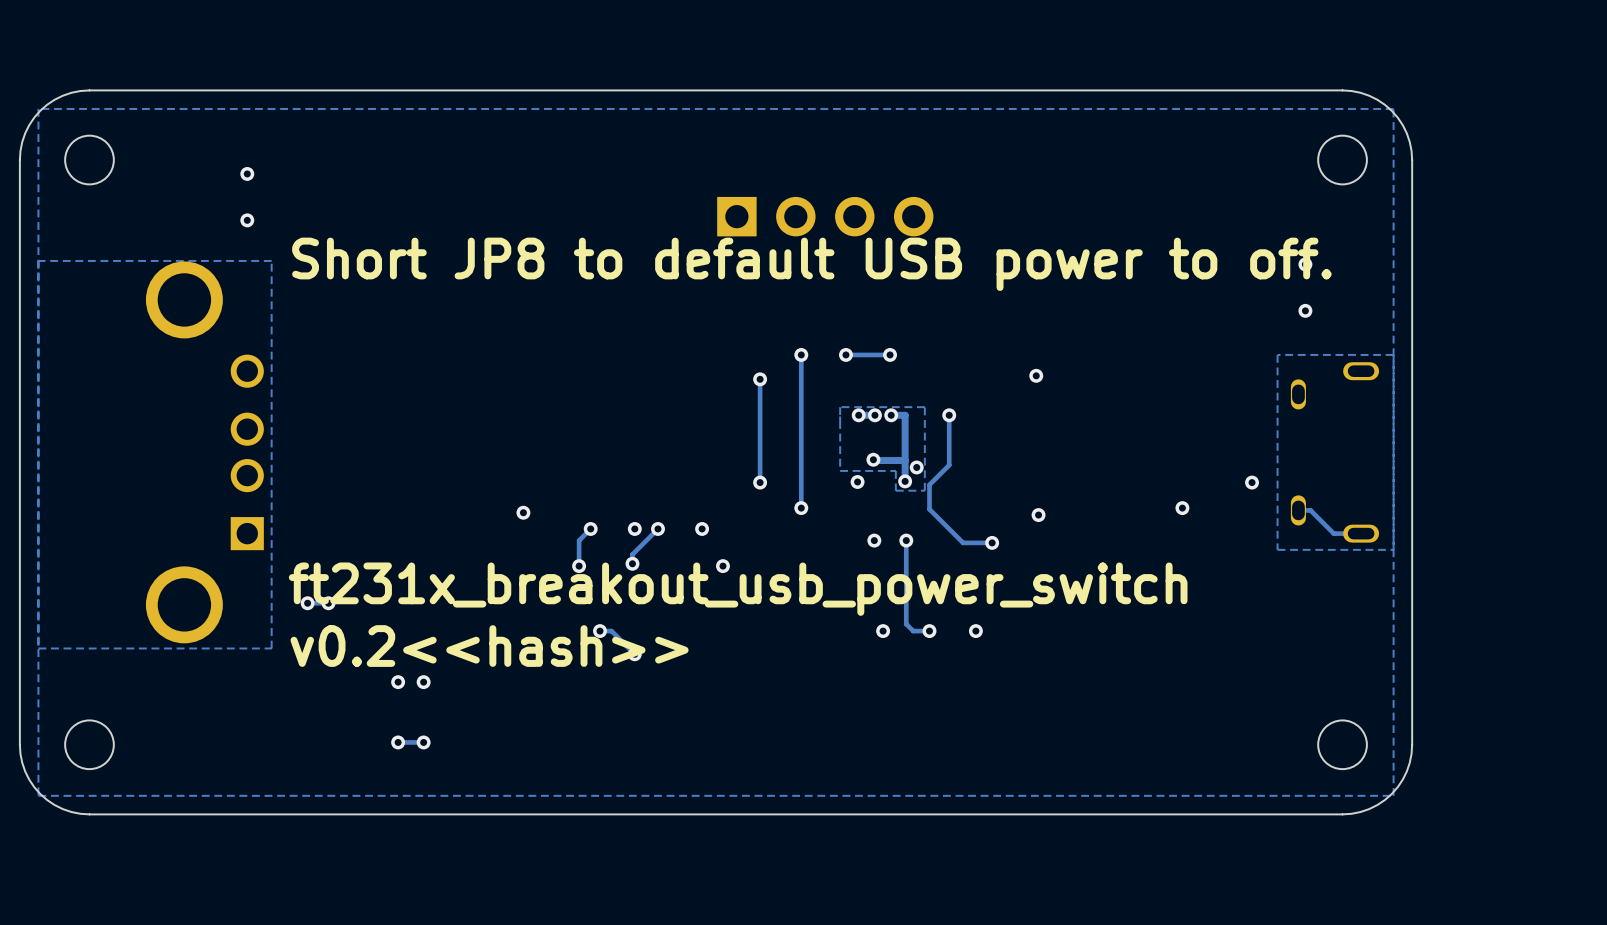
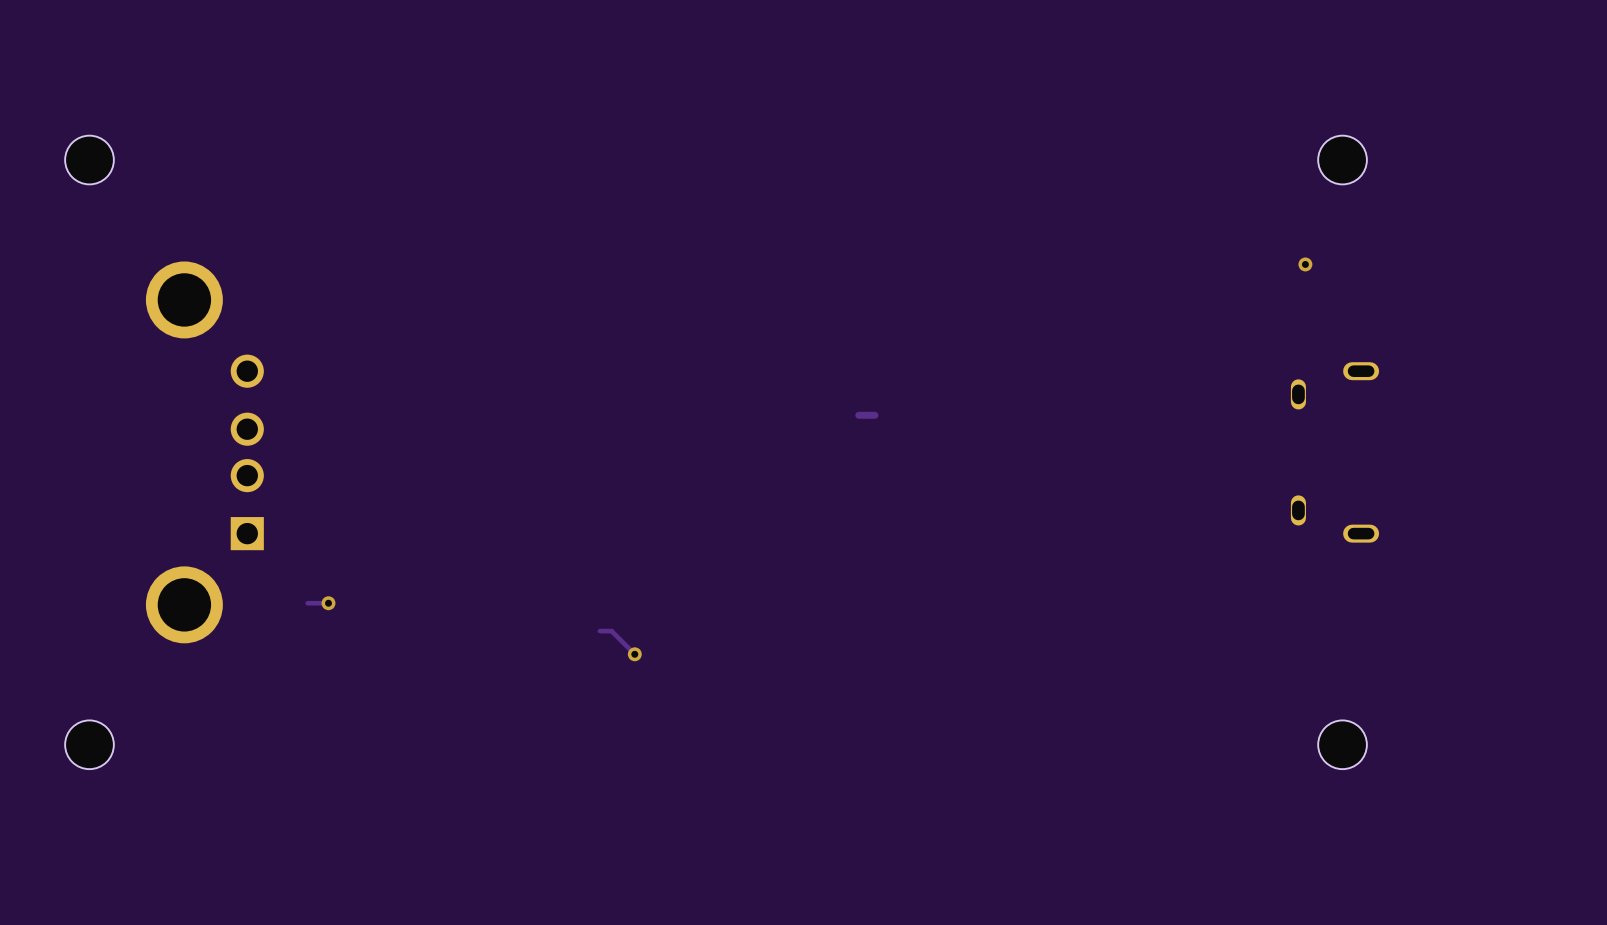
board edge: (1342, 90) (89, 90) (71, 92) (54, 99) (40, 110) (29, 125) (22, 142) (19, 160) (19, 744) (22, 762) (29, 779) (40, 794) (54, 805) (71, 812) (89, 814) (1342, 814) (1360, 812) (1377, 805) (1391, 794) (1402, 779) (1409, 762) (1412, 744) (1412, 160) (1406, 133) (1391, 110) (1369, 95) (1342, 90) -> none
zone outline: (1393, 108) (1393, 795) (38, 795) (38, 108) (1393, 108) -> none
via: (247, 173) -> none
part: (825, 216) -> none
via: (247, 220) -> none
zone outline: (38, 260) (271, 260) (271, 648) (38, 648) -> none
text: Short JP8 to default USB power to off. (811, 264) -> none
via: (1305, 310) -> none
track: (801, 354) (801, 508) -> none
via: (801, 354) -> none
via: (845, 354) -> none
track: (890, 354) (845, 354) -> none
via: (890, 354) -> none
zone outline: (1393, 354) (1277, 354) (1277, 549) (1393, 549) -> none
via: (1036, 375) -> none
via: (760, 379) -> none
track: (760, 382) (760, 482) -> none
zone outline: (924, 407) (924, 490) (895, 490) (895, 470) (840, 470) (840, 407) (924, 407) -> none
via: (858, 415) -> none
via: (874, 415) -> none
track: (891, 415) (905, 415) (905, 481) -> none
via: (891, 415) -> none
track: (949, 415) (949, 465) (929, 484) (929, 509) (963, 542) (992, 542) -> none
via: (949, 415) -> none
track: (873, 459) (905, 460) -> none
via: (873, 459) -> none
via: (916, 467) -> none
via: (857, 481) -> none
via: (905, 481) -> none
via: (760, 482) -> none
via: (1252, 482) -> none
via: (801, 508) -> none
via: (1182, 508) -> none
track: (1298, 510) (1310, 510) (1333, 533) (1361, 533) -> none
via: (523, 512) -> none
via: (1038, 515) -> none
track: (590, 528) (579, 540) (579, 566) -> none
via: (590, 528) -> none
via: (634, 528) -> none
track: (658, 528) (632, 554) (632, 563) -> none
via: (658, 528) -> none
via: (702, 528) -> none
via: (874, 540) -> none
track: (906, 540) (906, 624) (913, 631) (929, 631) -> none
via: (906, 540) -> none
via: (992, 542) -> none
via: (632, 563) -> none
via: (579, 566) -> none
via: (722, 566) -> none
text: ft231x_breakout_usb_power_switch (738, 589) -> none
via: (307, 603) -> none
via: (599, 631) -> none
via: (883, 631) -> none
via: (929, 631) -> none
via: (975, 631) -> none
text: v0.2<<hash>> (489, 646) -> none
via: (398, 682) -> none
via: (423, 682) -> none
via: (398, 742) -> none
track: (423, 742) (398, 742) -> none
via: (423, 742) -> none

